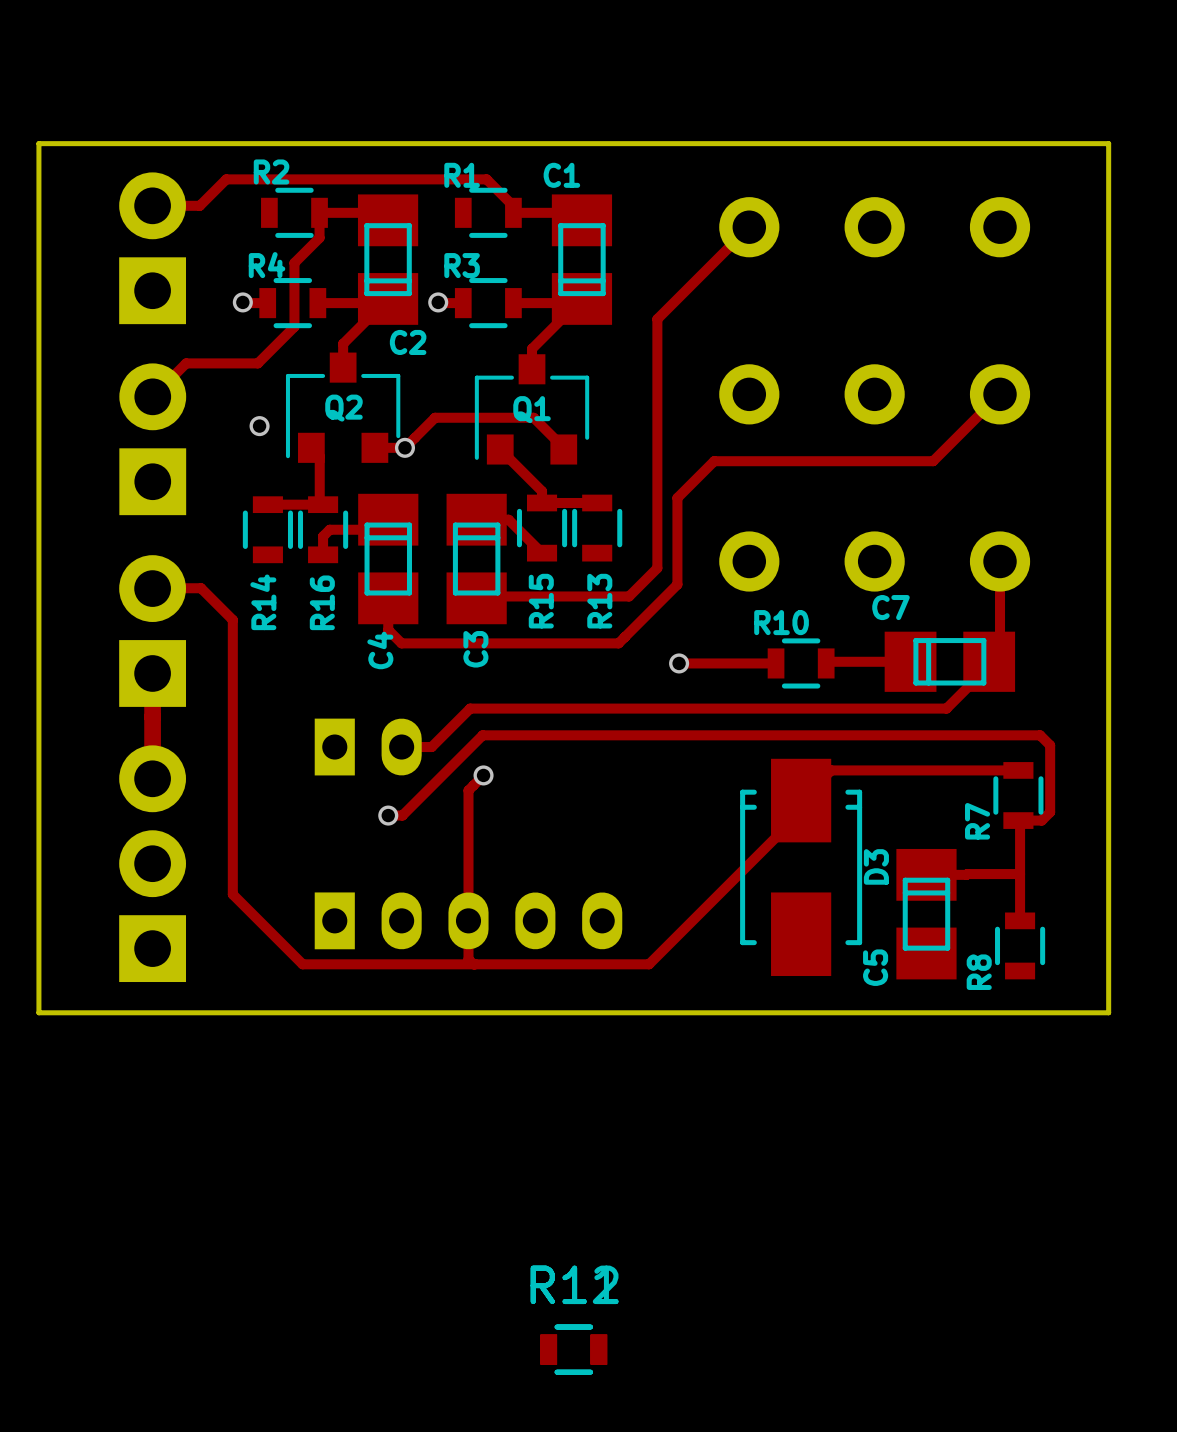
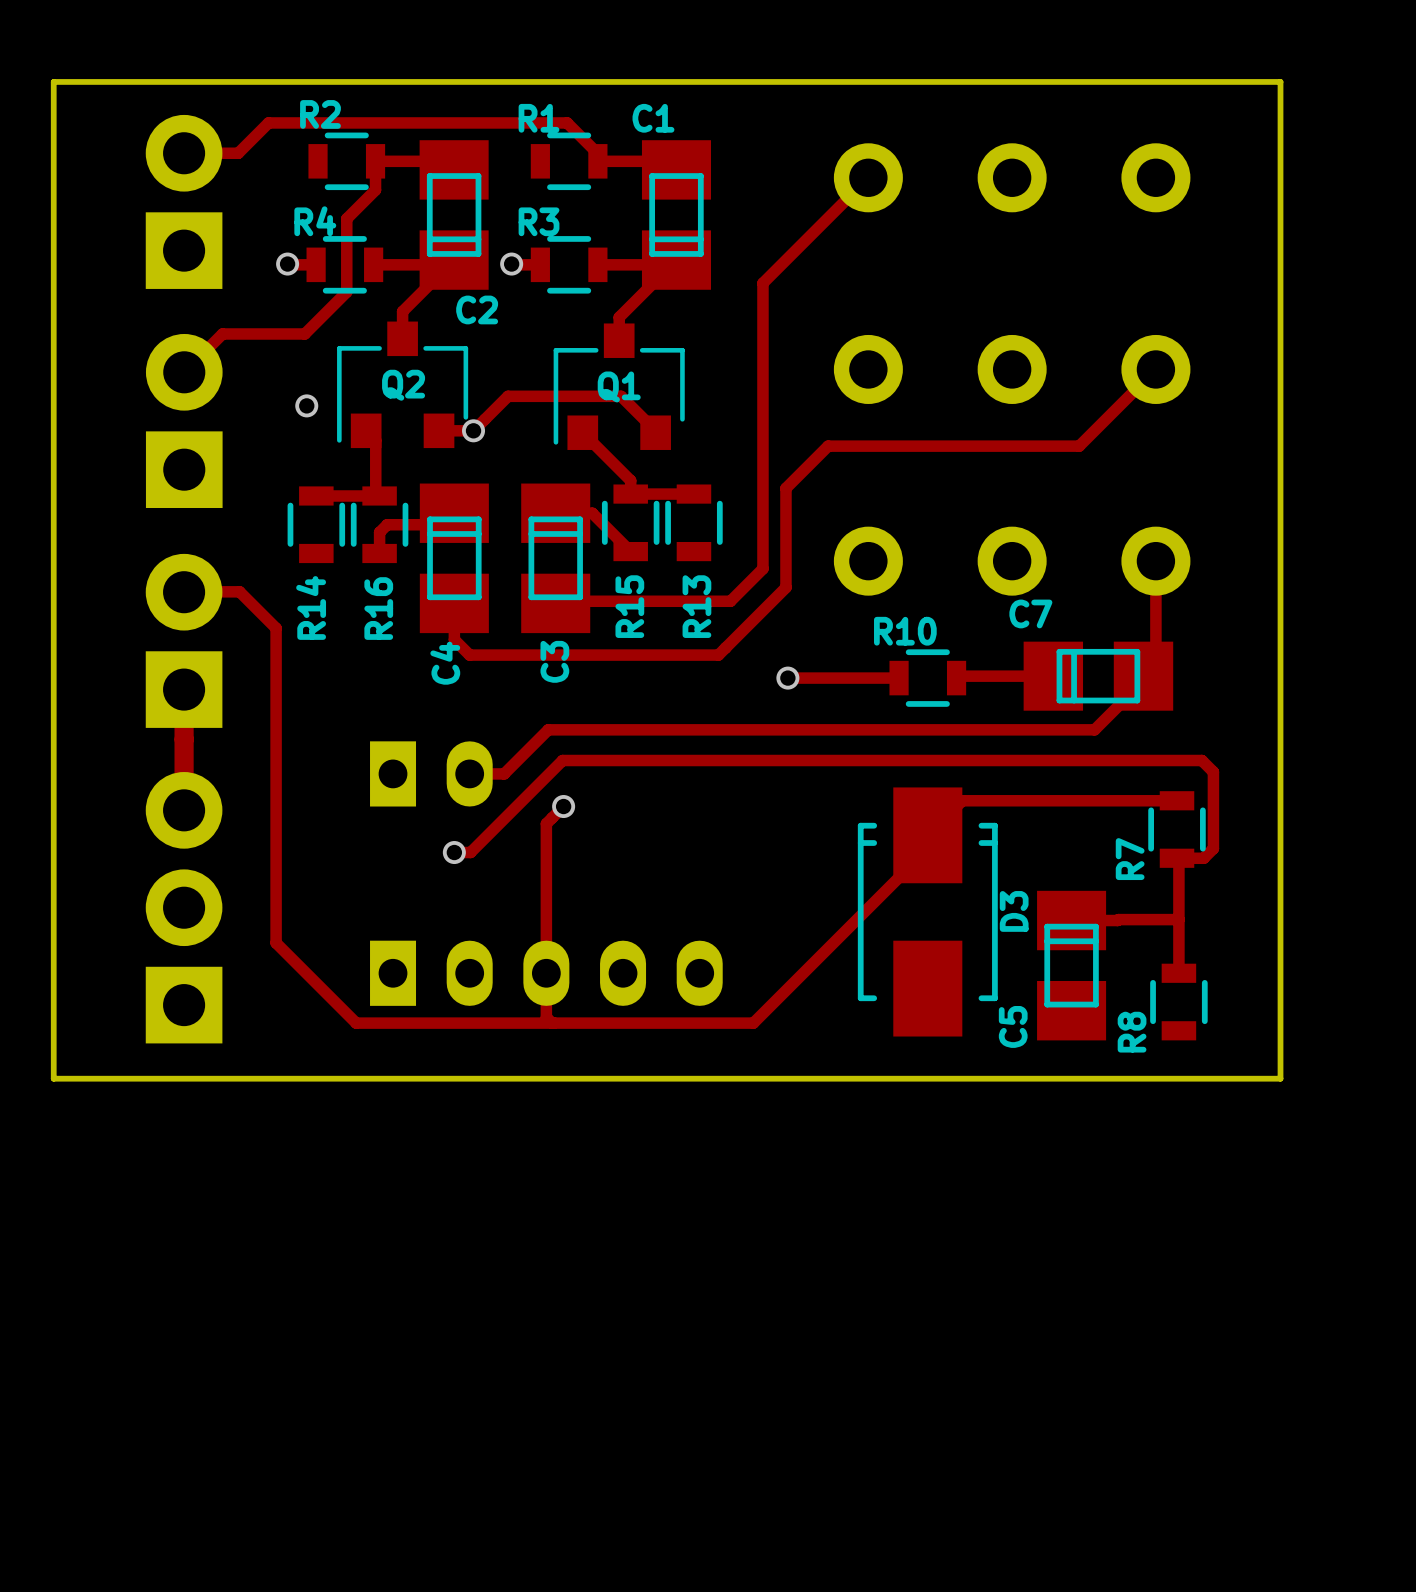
part: (573, 1349) -> none
part: (573, 1349) -> none

